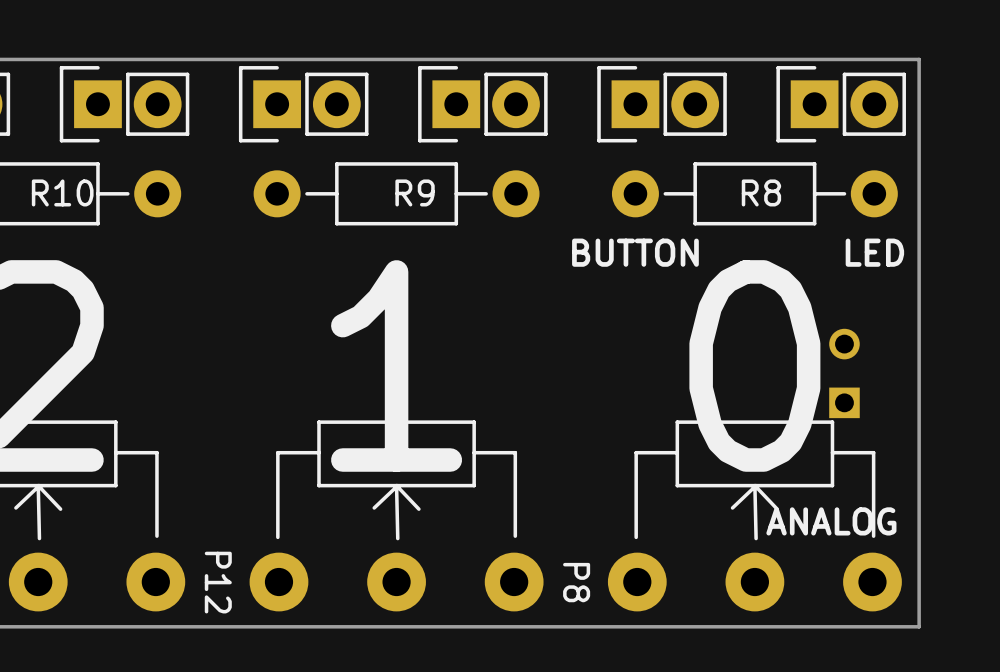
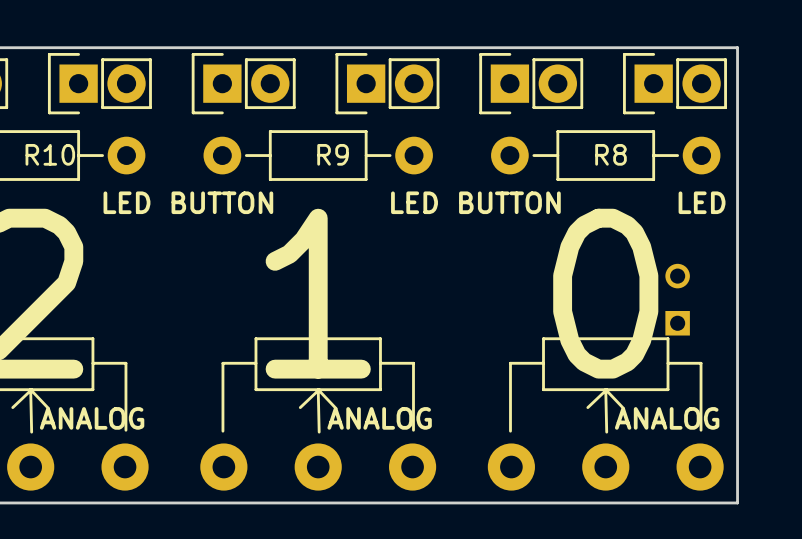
text: none -> LED (126, 202)
text: none -> BUTTON (222, 202)
text: none -> LED (414, 202)
text: none -> ANALOG (92, 418)
text: none -> ANALOG (379, 418)
P12 name: P12 (218, 582) -> none
P8 name: P8 (576, 582) -> none

